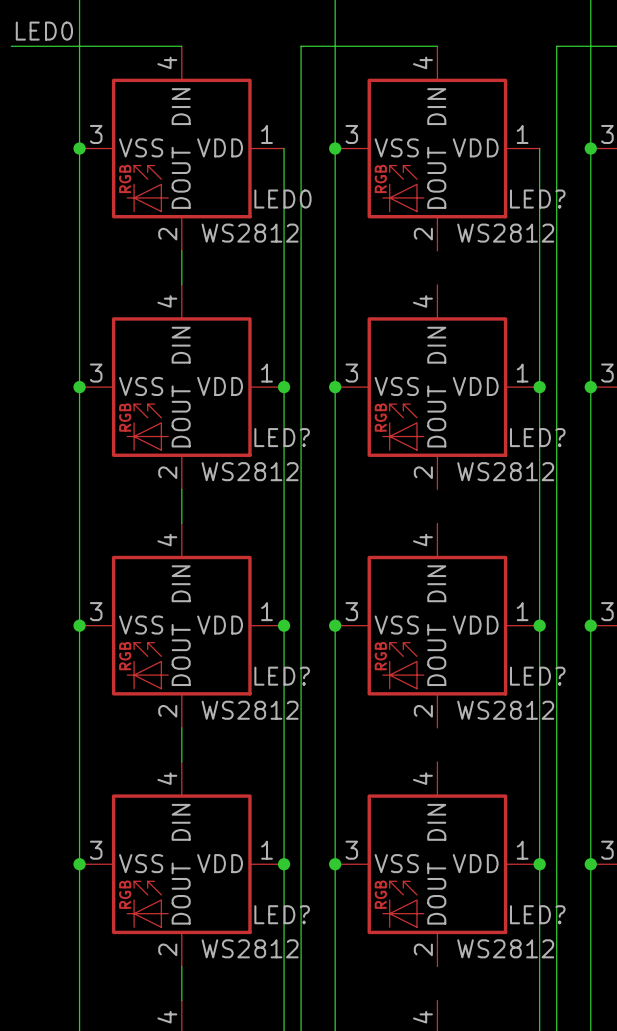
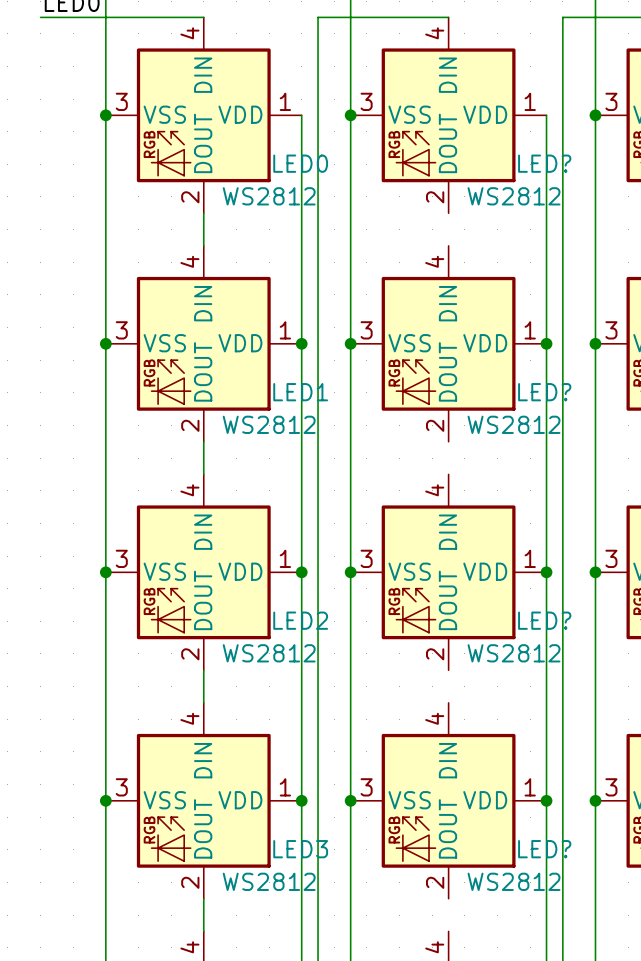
LED? name: LED? (282, 437) -> LED1 (300, 392)
LED? name: LED? (282, 676) -> LED2 (300, 620)
LED? name: LED? (282, 914) -> LED3 (300, 849)

